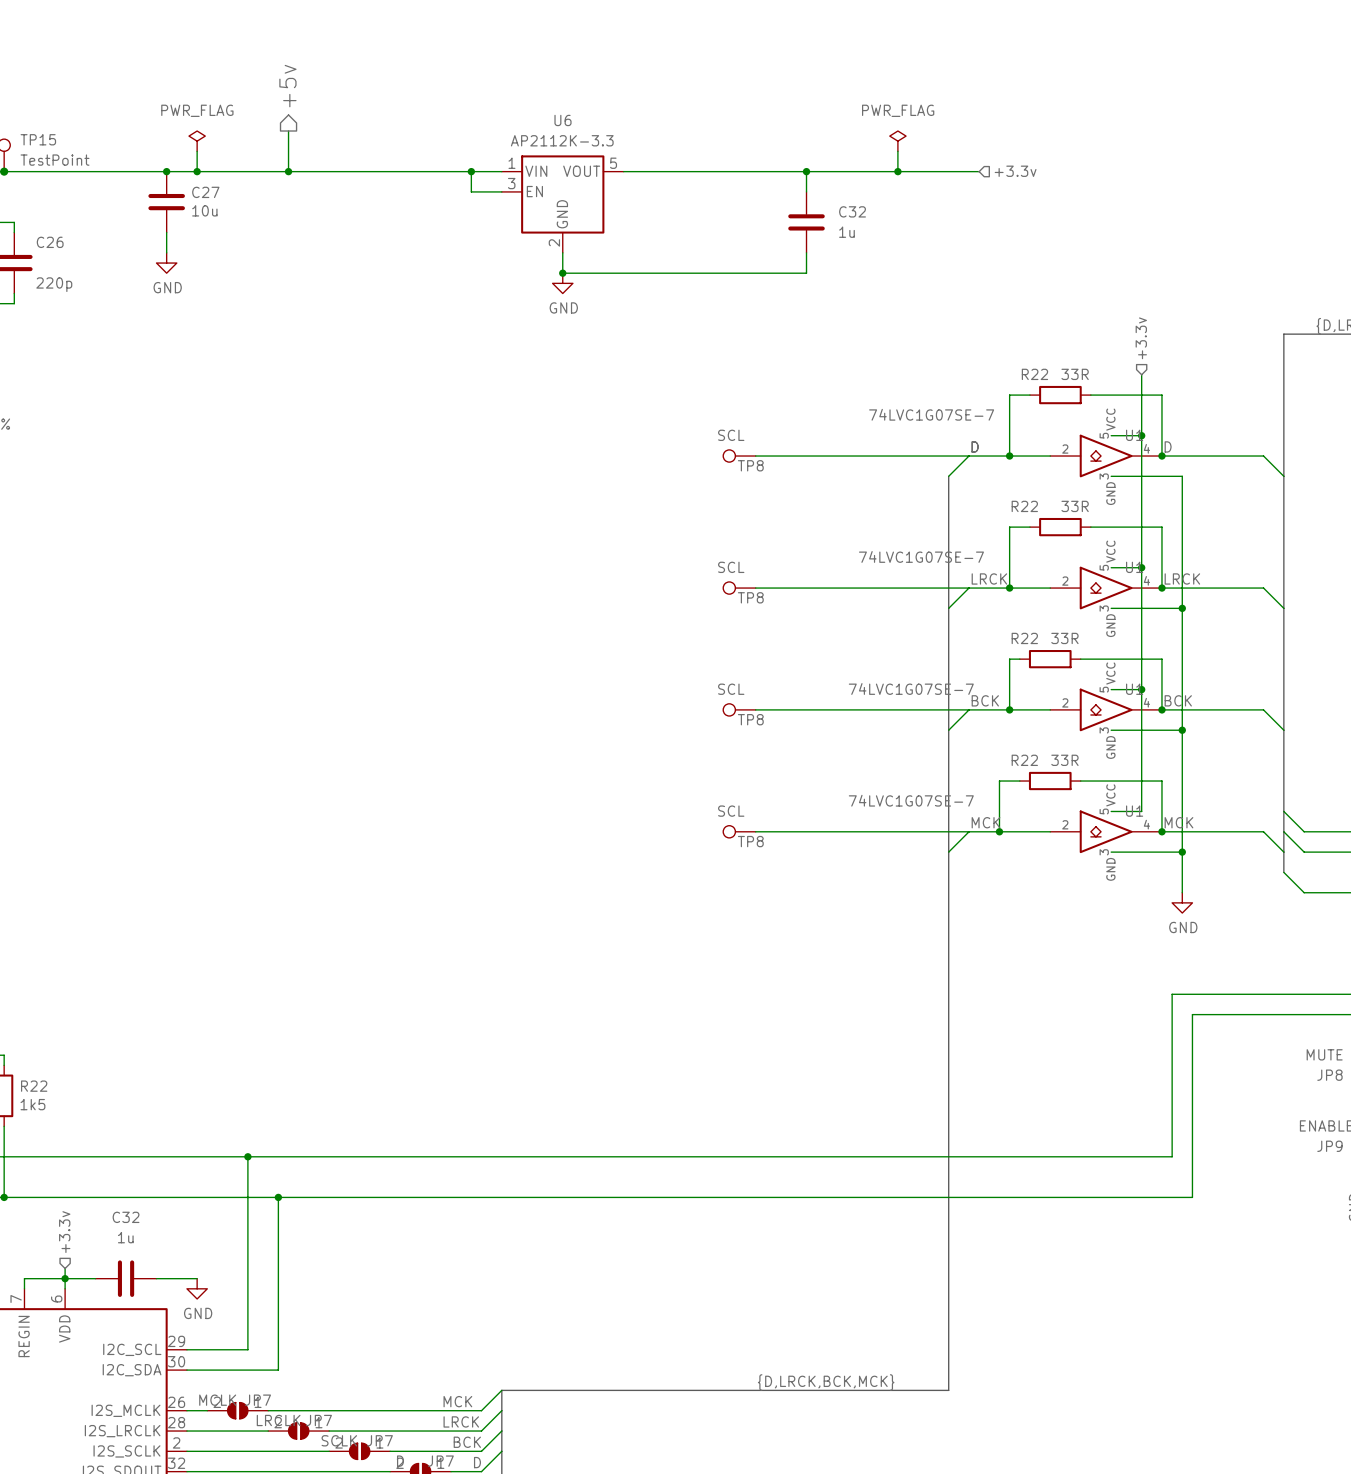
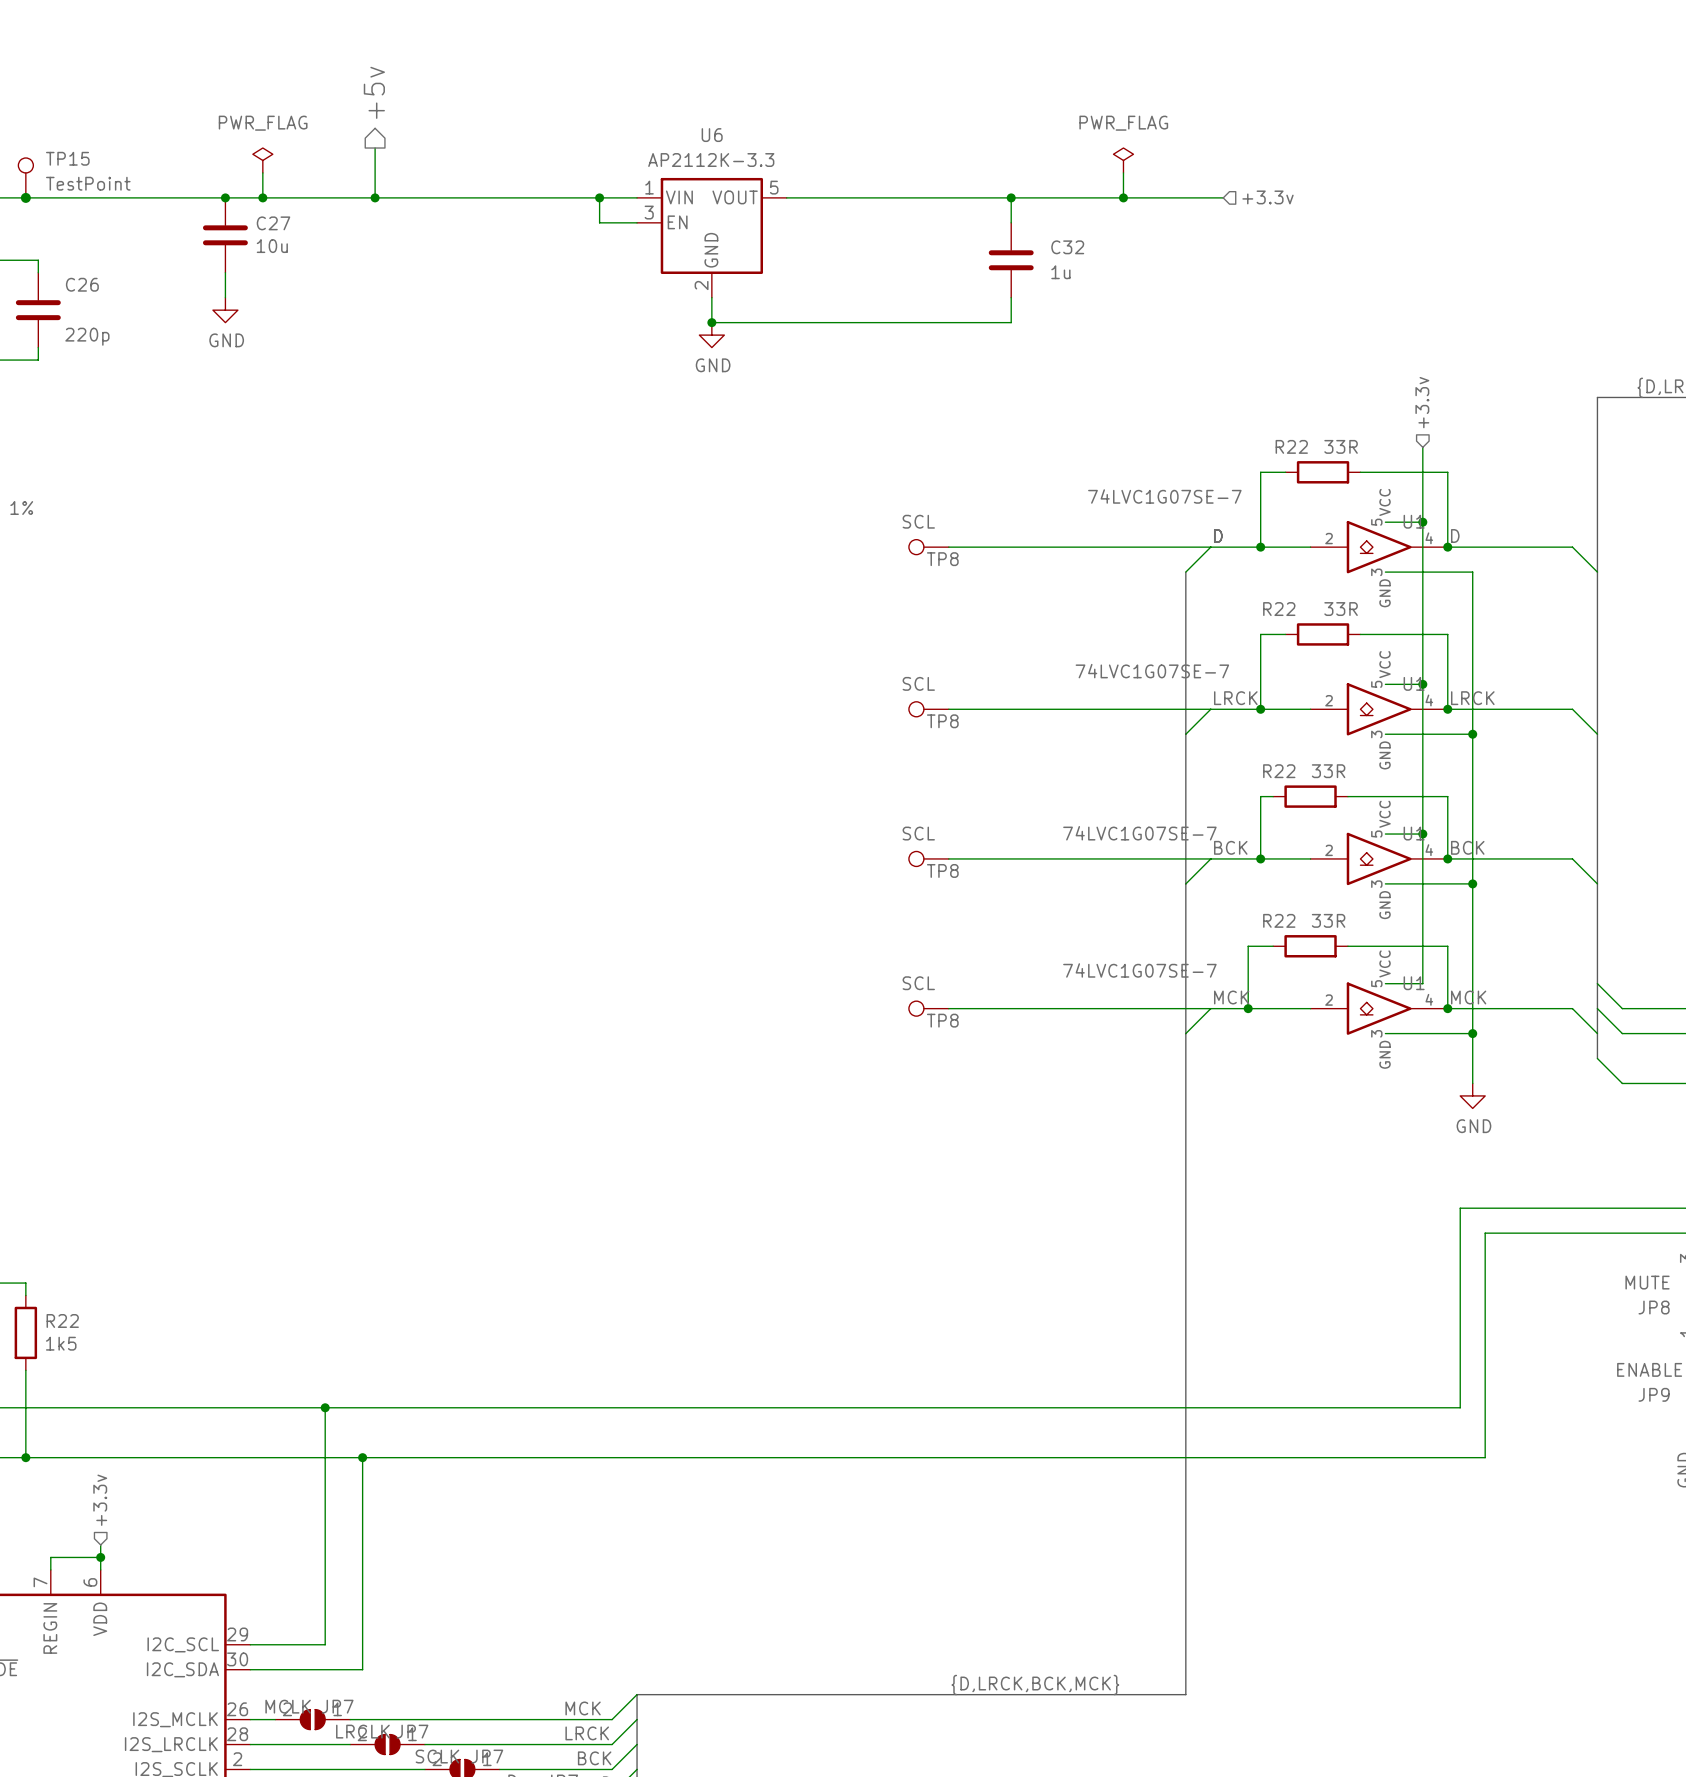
wire: (65, 1278) (95, 1278) -> none
C32: 1u (126, 1278) -> none
wire: (156, 1278) (197, 1278) -> none
power symbol: GND (197, 1288) -> none

